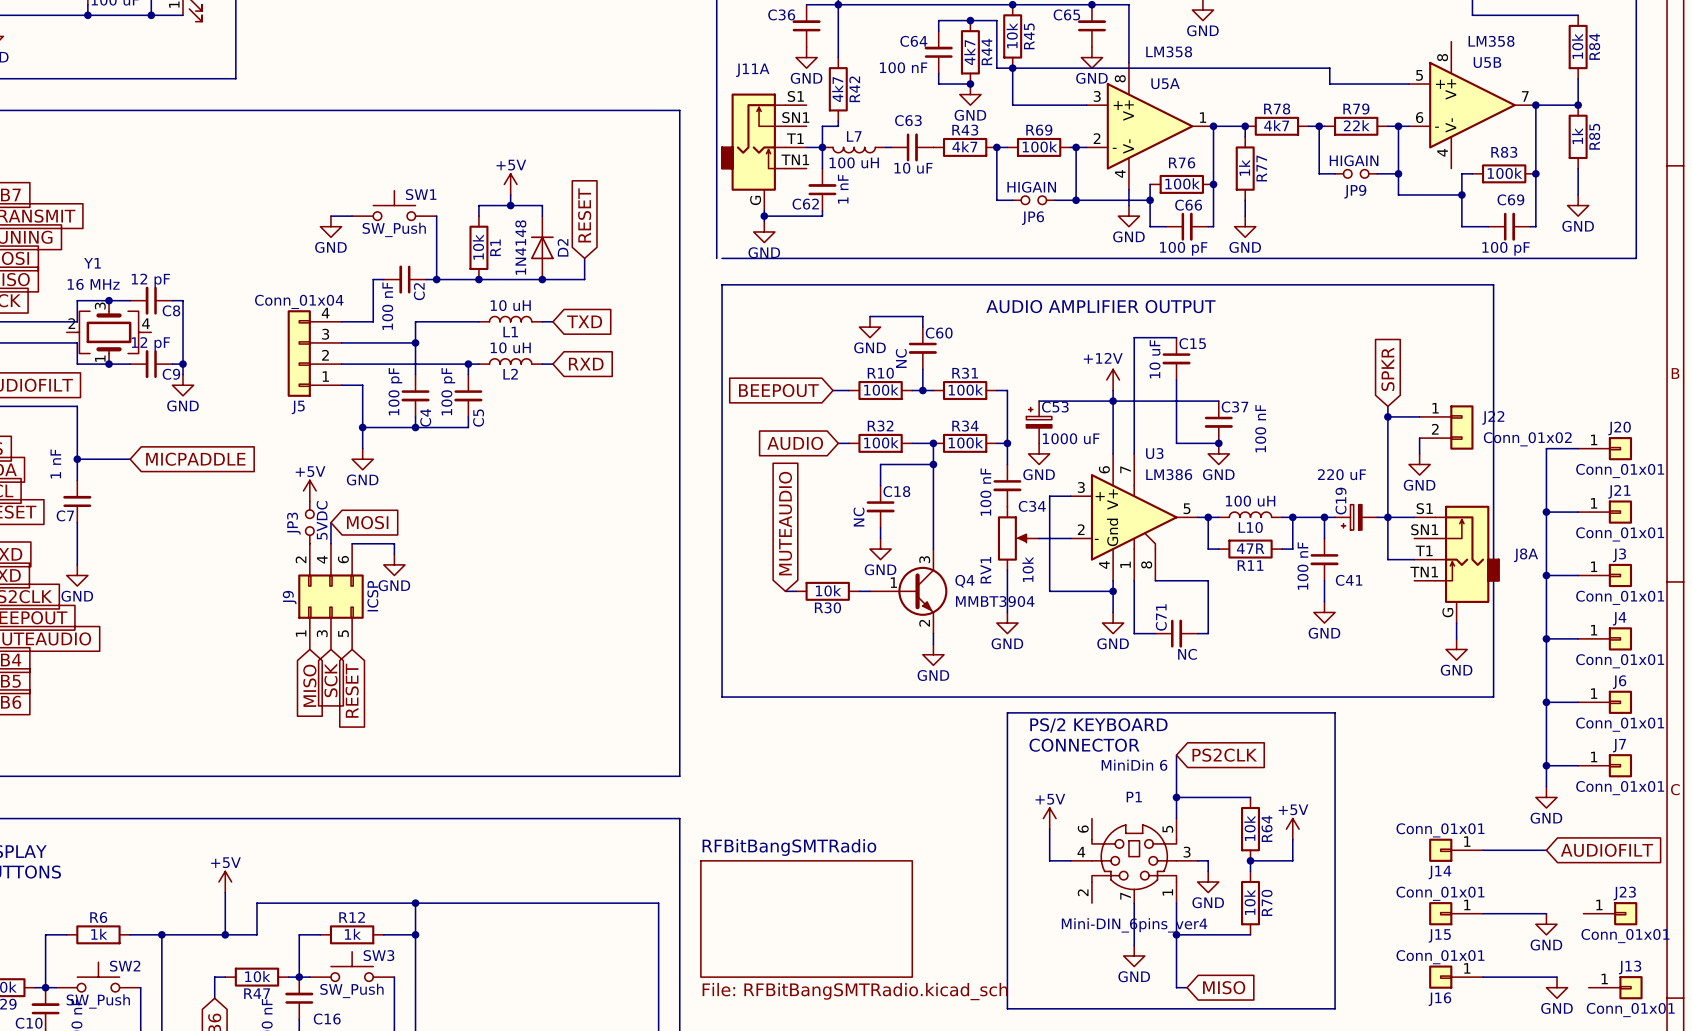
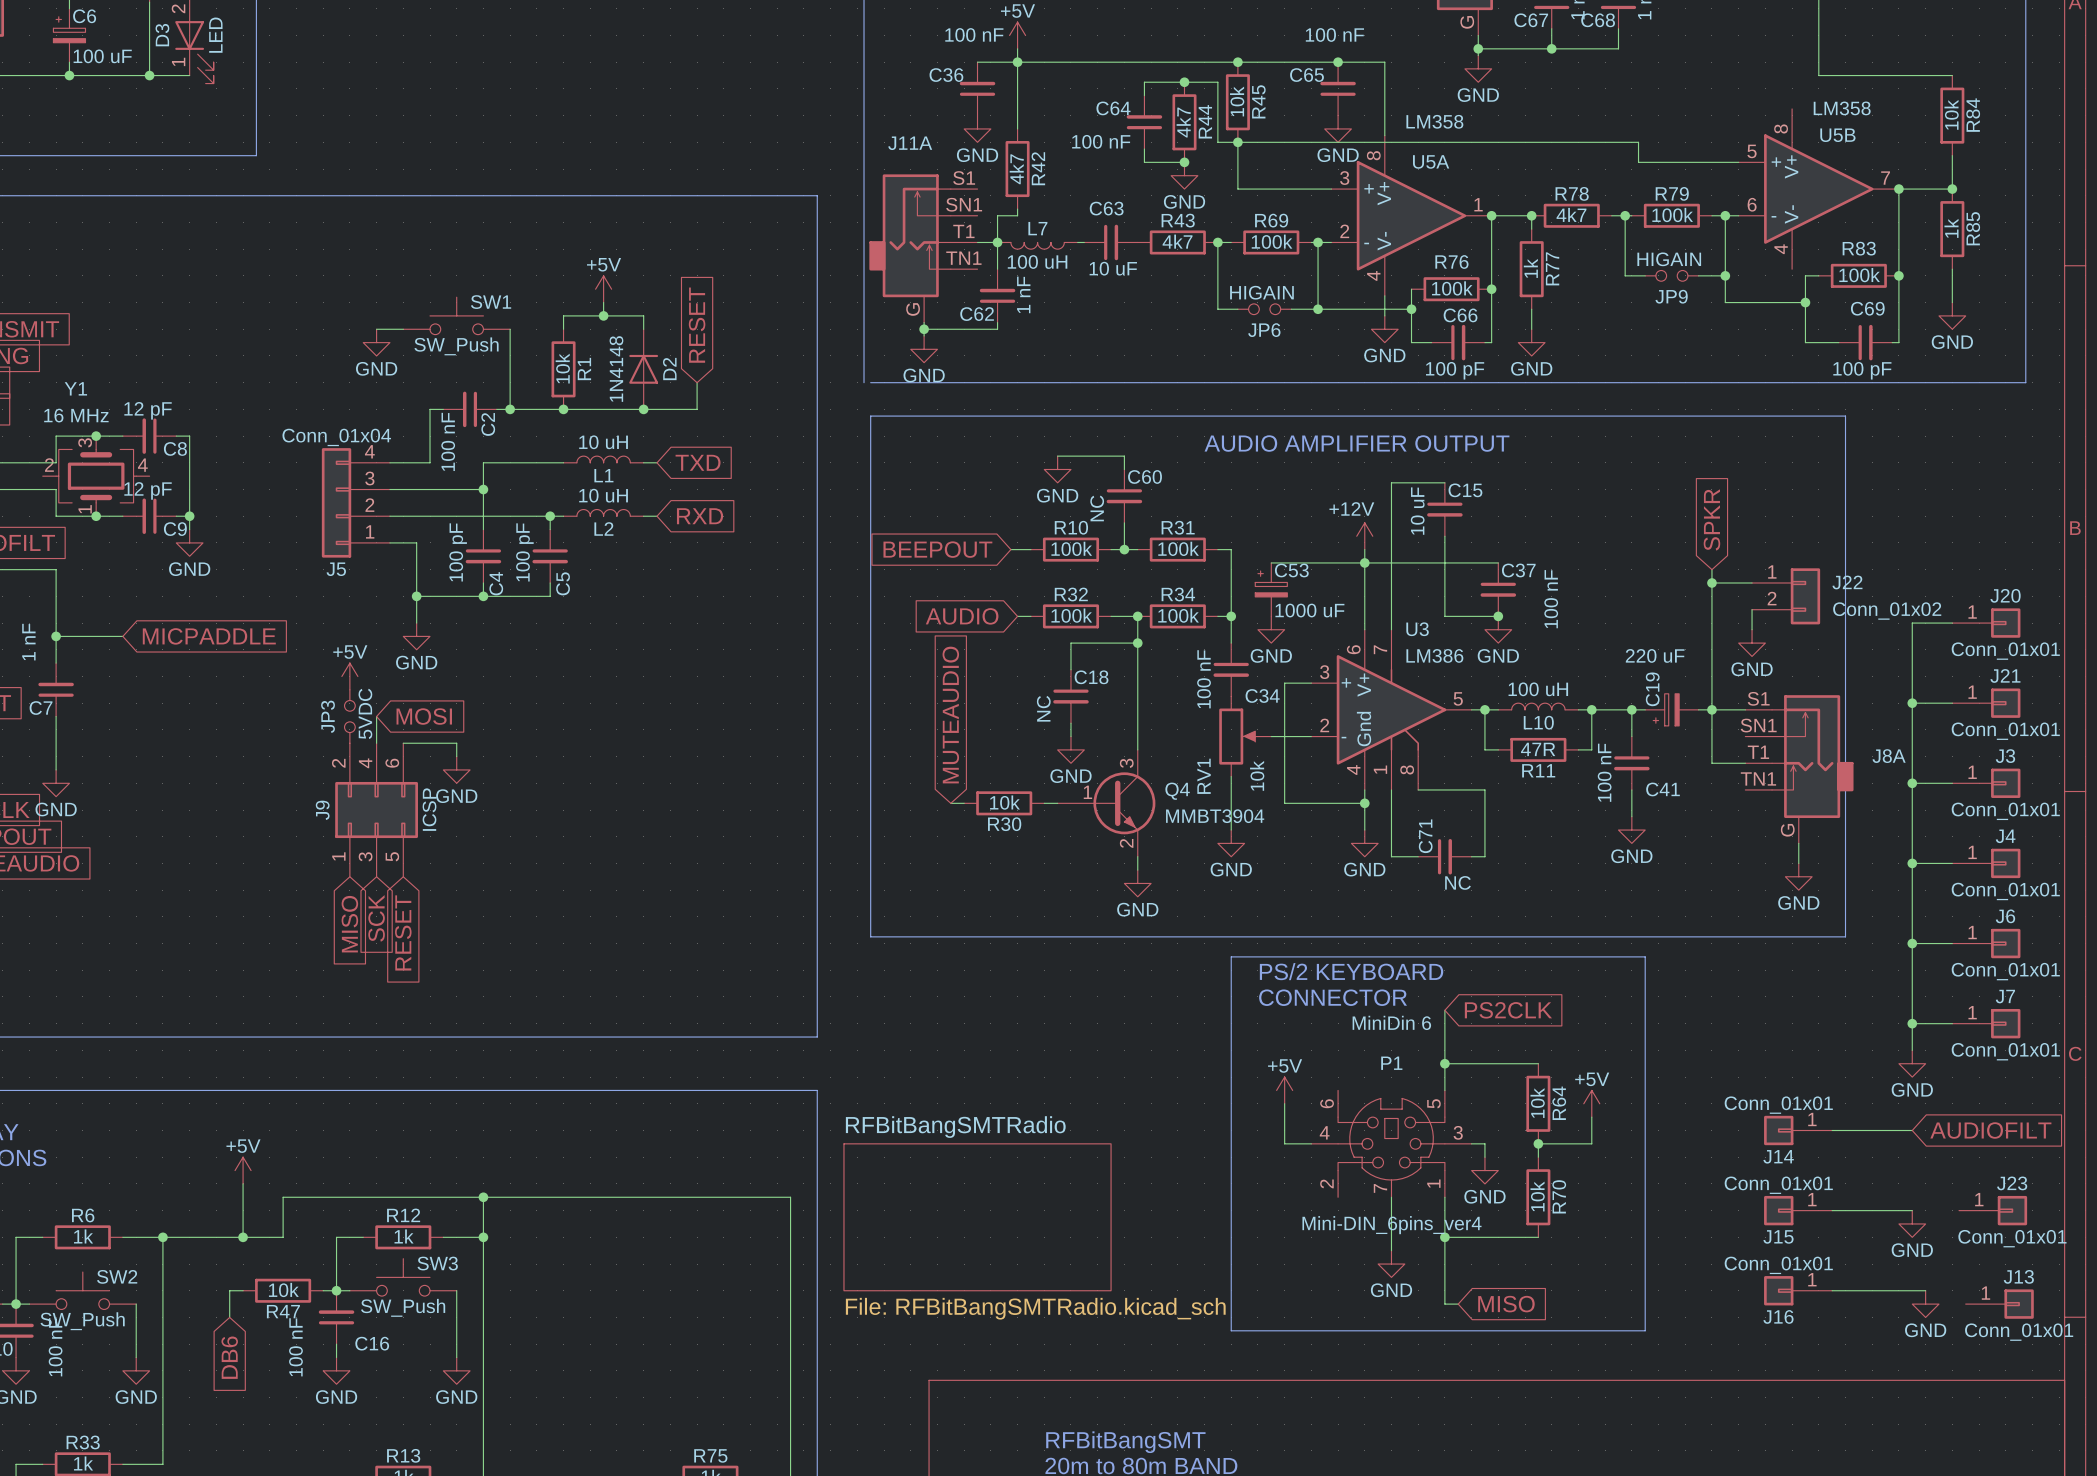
R79 value: 22k (1356, 125) -> 100k (1672, 215)

